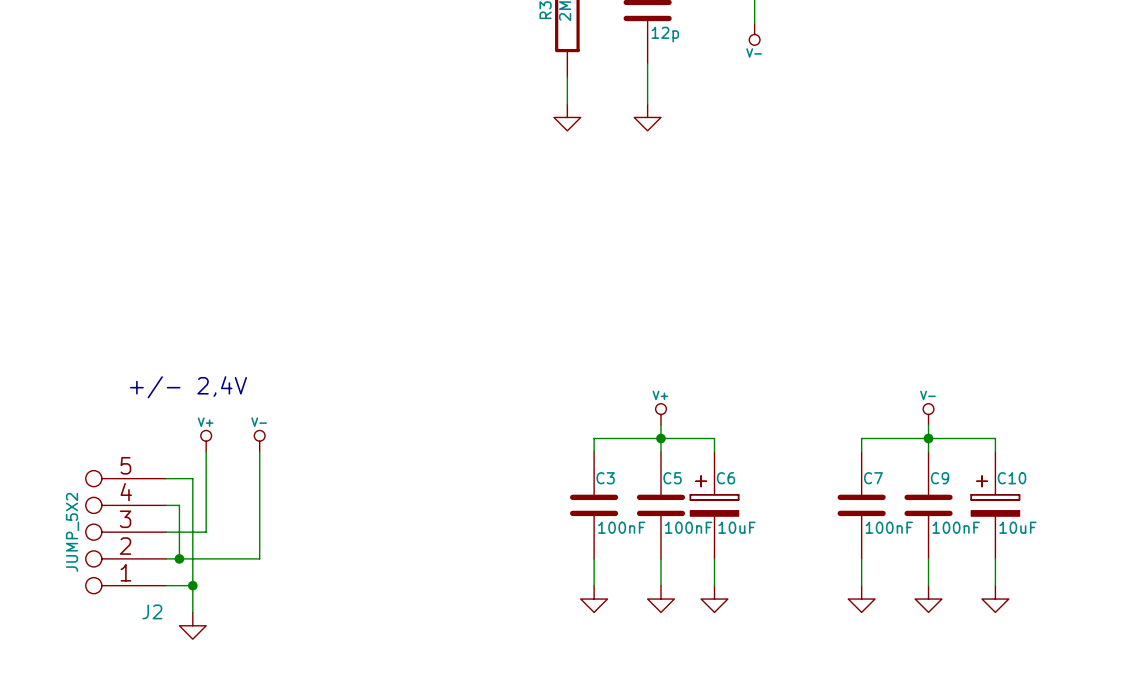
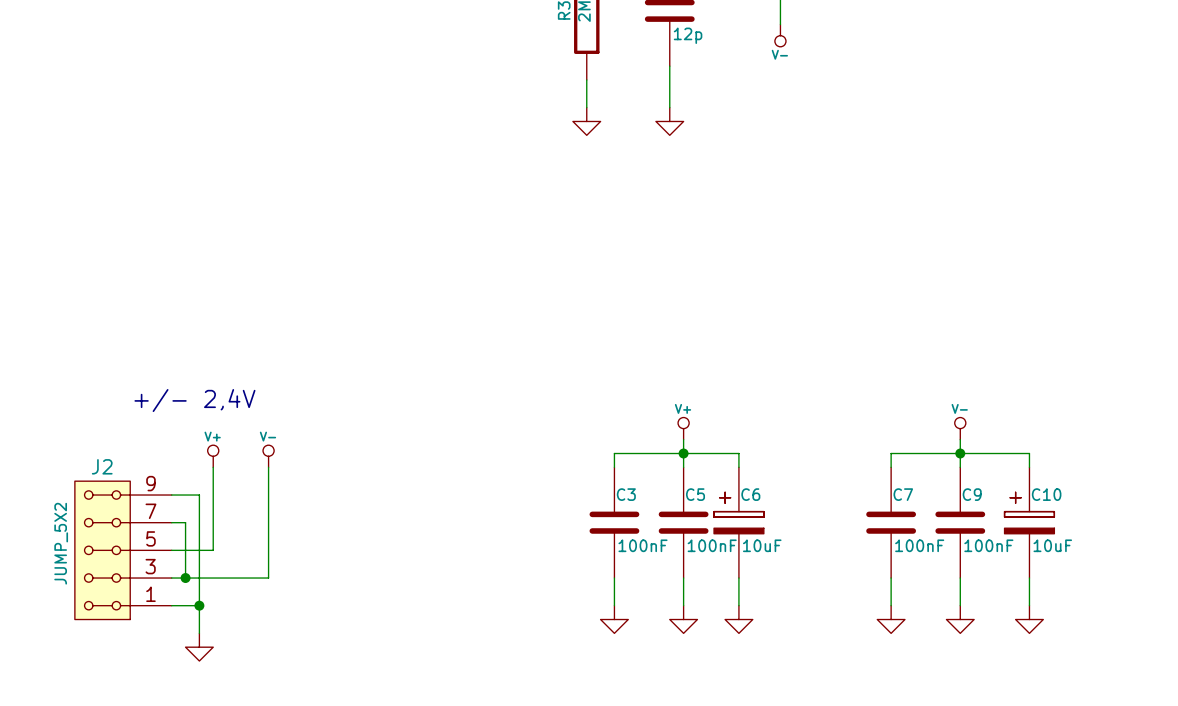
J2 symbol: [85, 470, 167, 594] -> [74, 481, 172, 620]
J2 name position: J2 (152, 611) -> J2 (102, 466)

